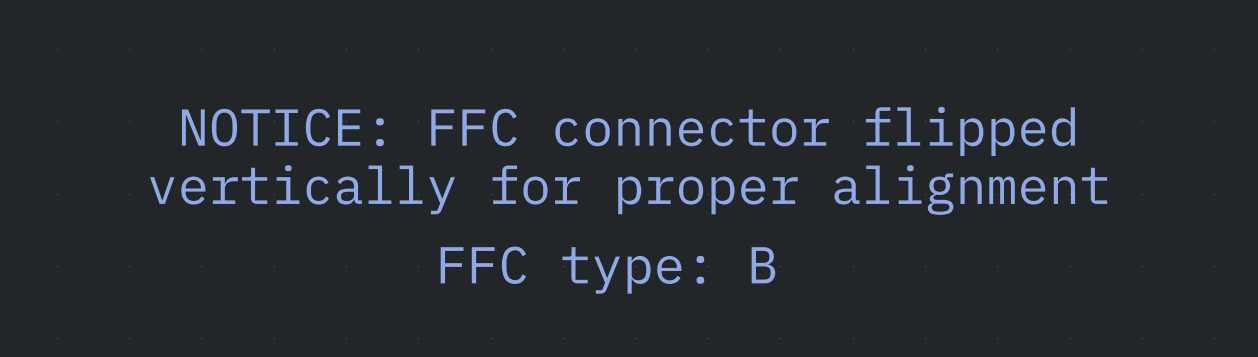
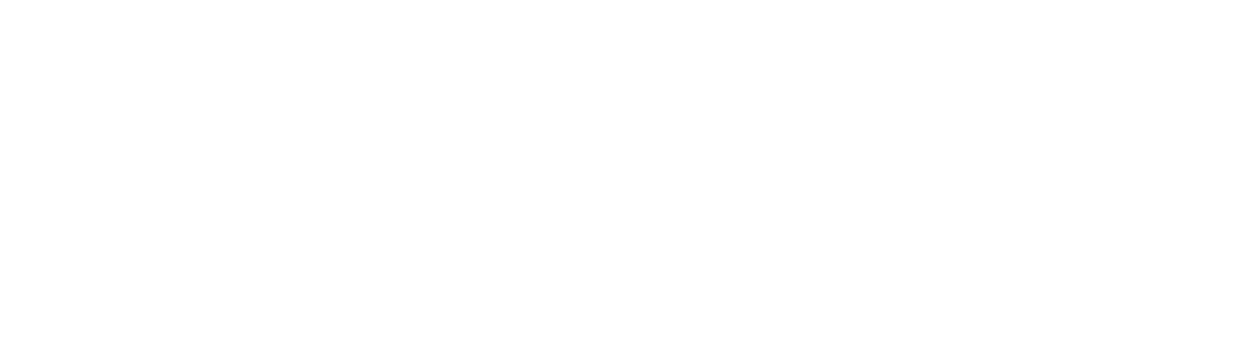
text: NOTICE: FFC connector flipped (628, 131) -> none
text: vertically for proper alignment (628, 190) -> none
text: FFC type: B (607, 270) -> none

